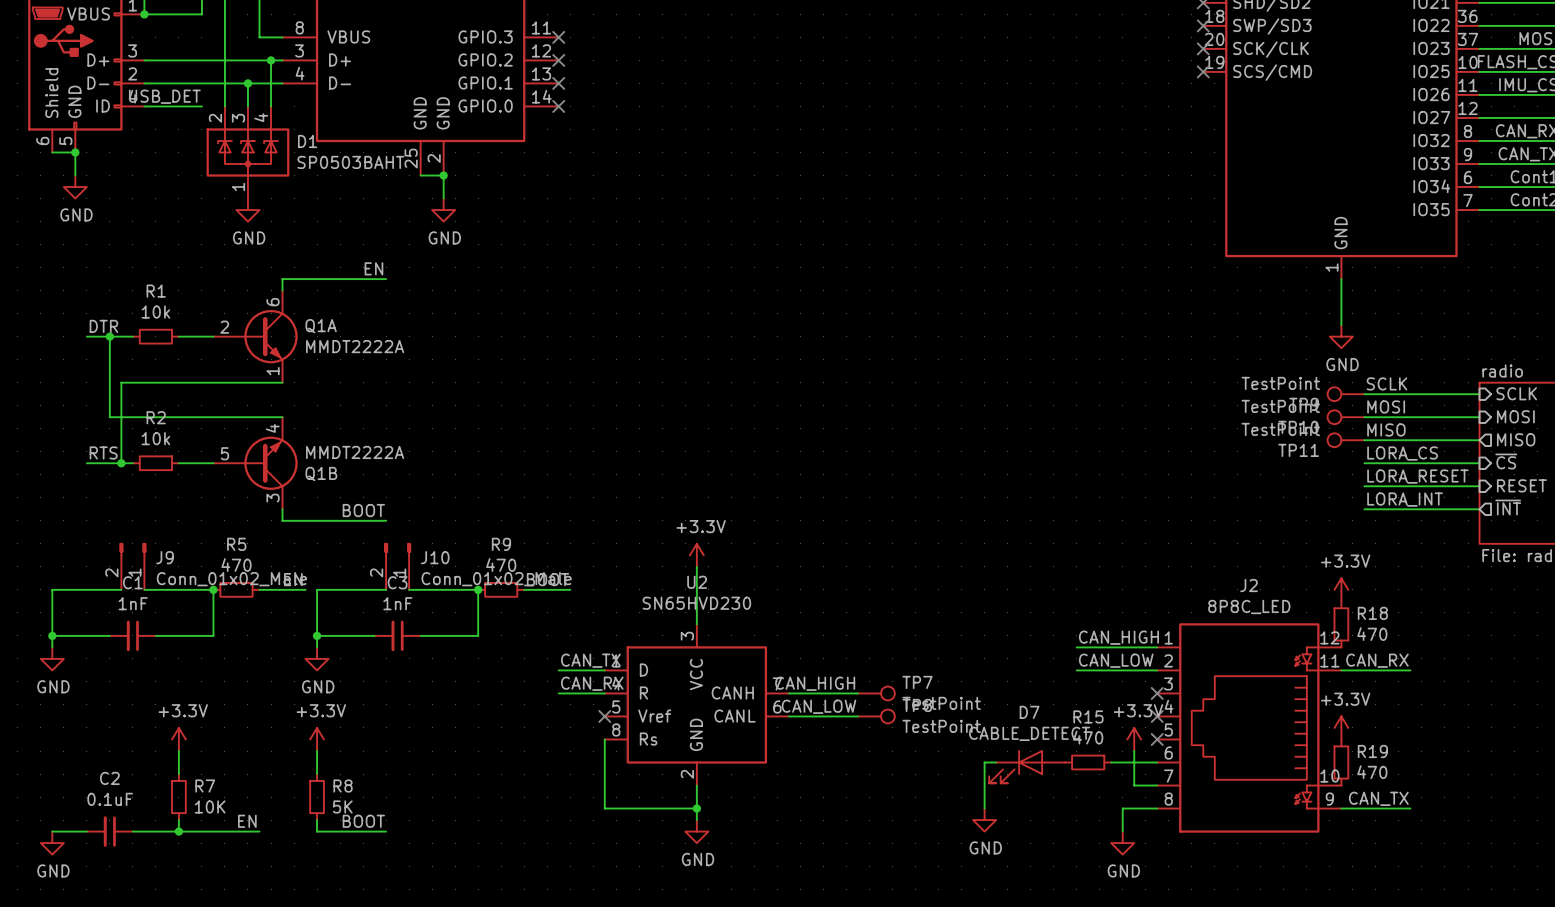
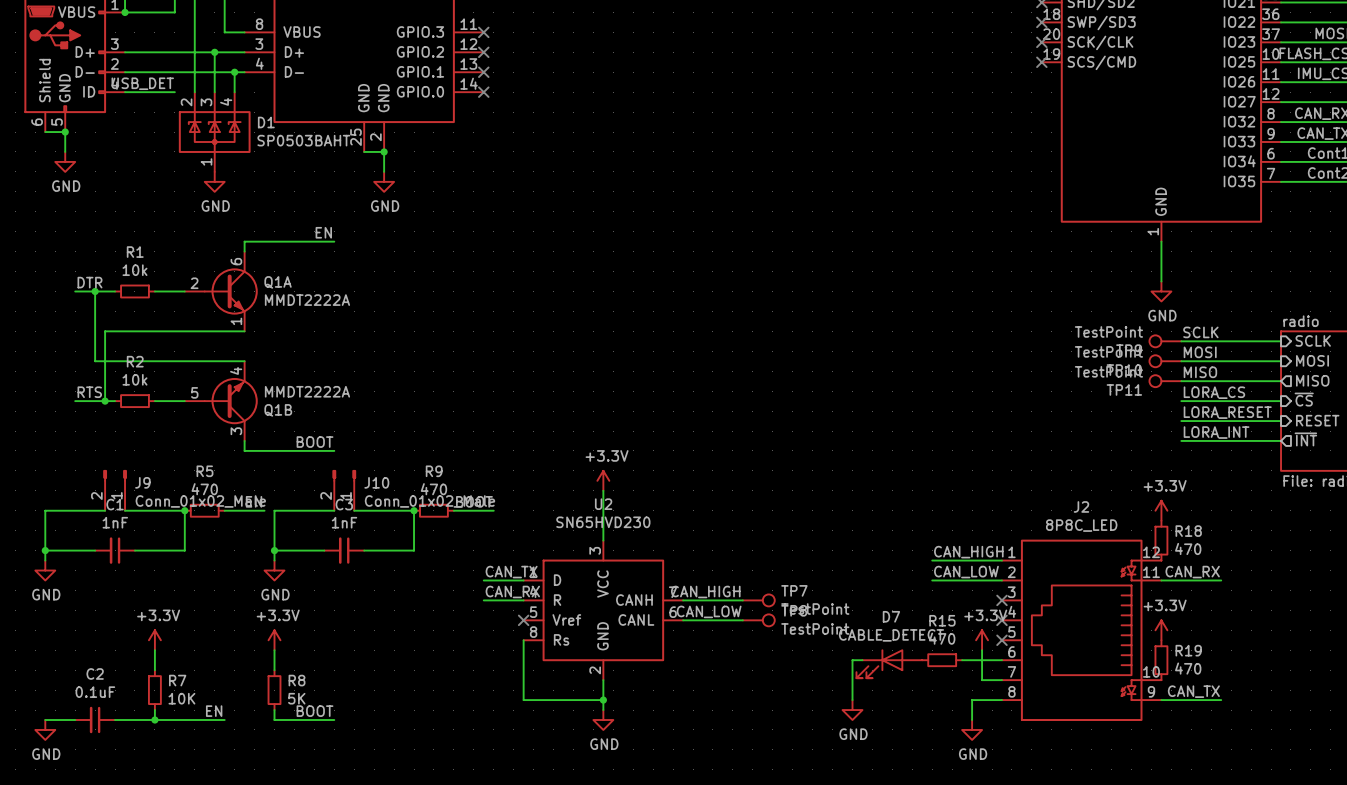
junction: none -> (214, 52)
wire: (271, 60) (271, 83) -> (214, 52) (214, 72)
junction: (271, 60) -> none
junction: (247, 83) -> none
junction: none -> (234, 72)

